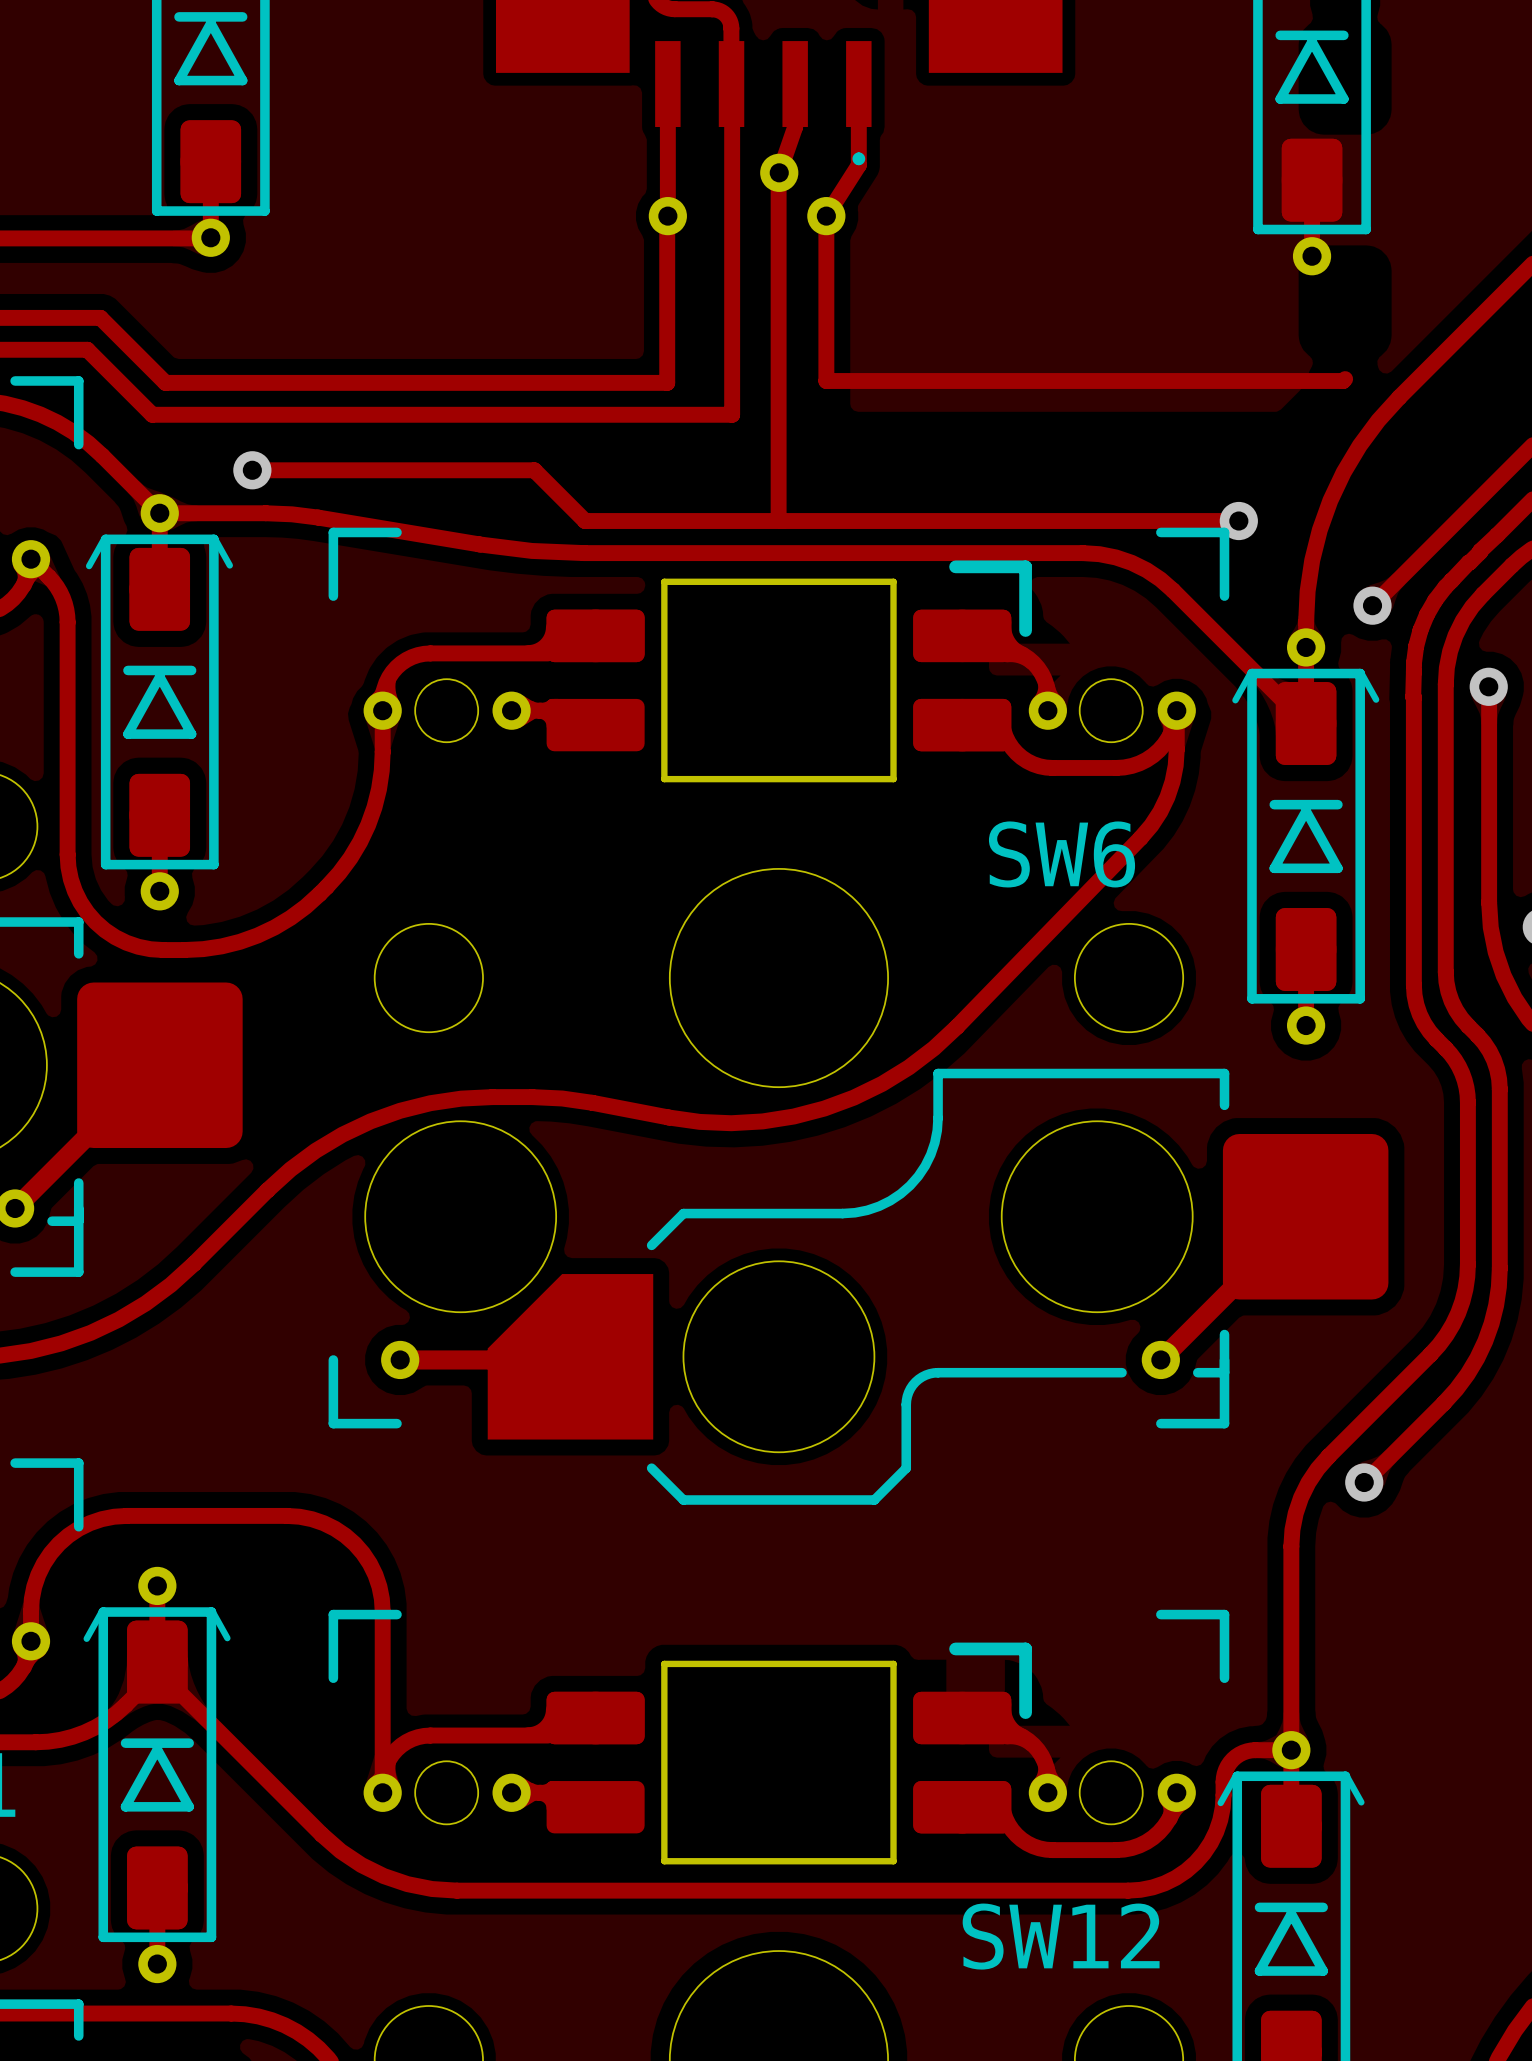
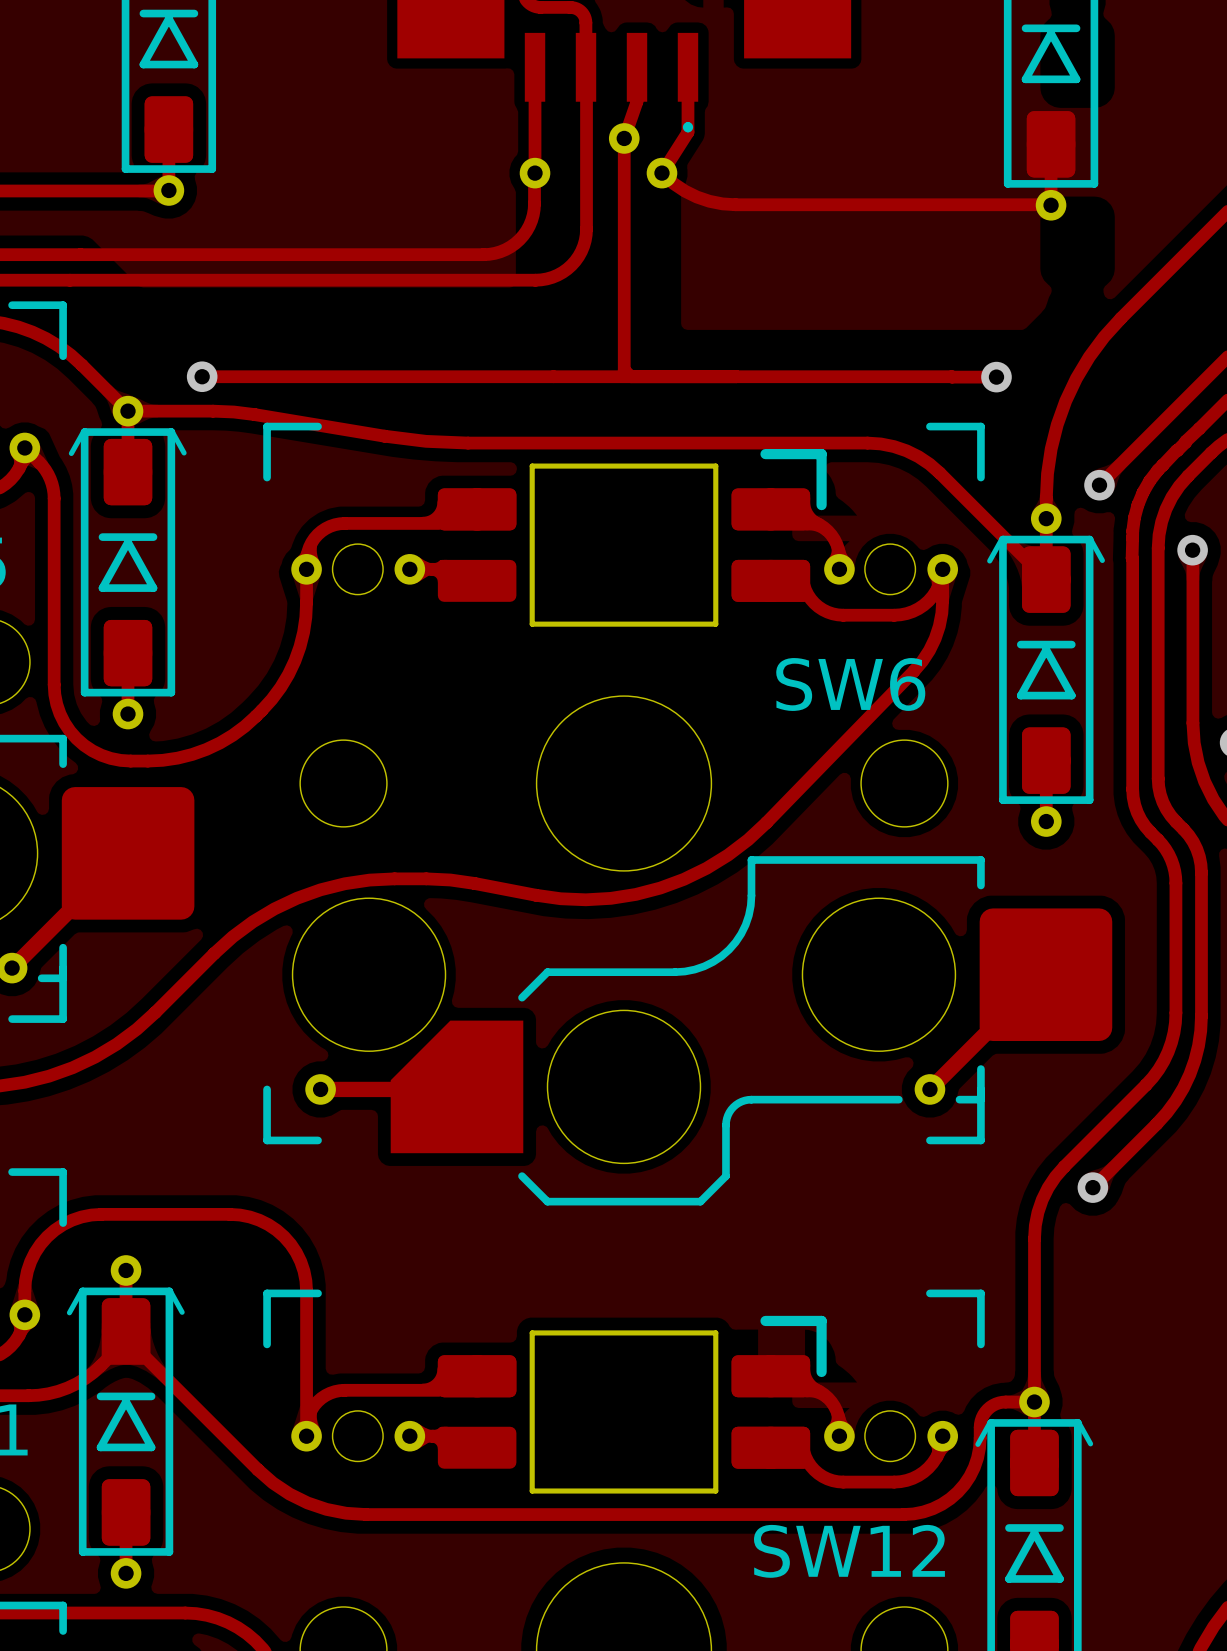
track: (778, 173) (778, 517) (782, 521) -> (624, 138) (624, 370) (630, 376)
track: (826, 216) (826, 381) (1343, 381) (1345, 379) -> (661, 173) (684, 191) (709, 201) (722, 203) (1050, 204)
track: (667, 254) (667, 382) (165, 382) (100, 317) -> (534, 203) (529, 225) (519, 239) (505, 249) (489, 254) (80, 254)
track: (732, 286) (732, 414) (152, 414) (87, 349) -> (586, 229) (583, 246) (575, 261) (562, 272) (541, 279) (69, 280)
track: (534, 470) (585, 521) (1238, 521) -> (428, 376) (951, 376)
track: none -> (952, 377) (996, 377)
via position: (1238, 521) -> (996, 377)

